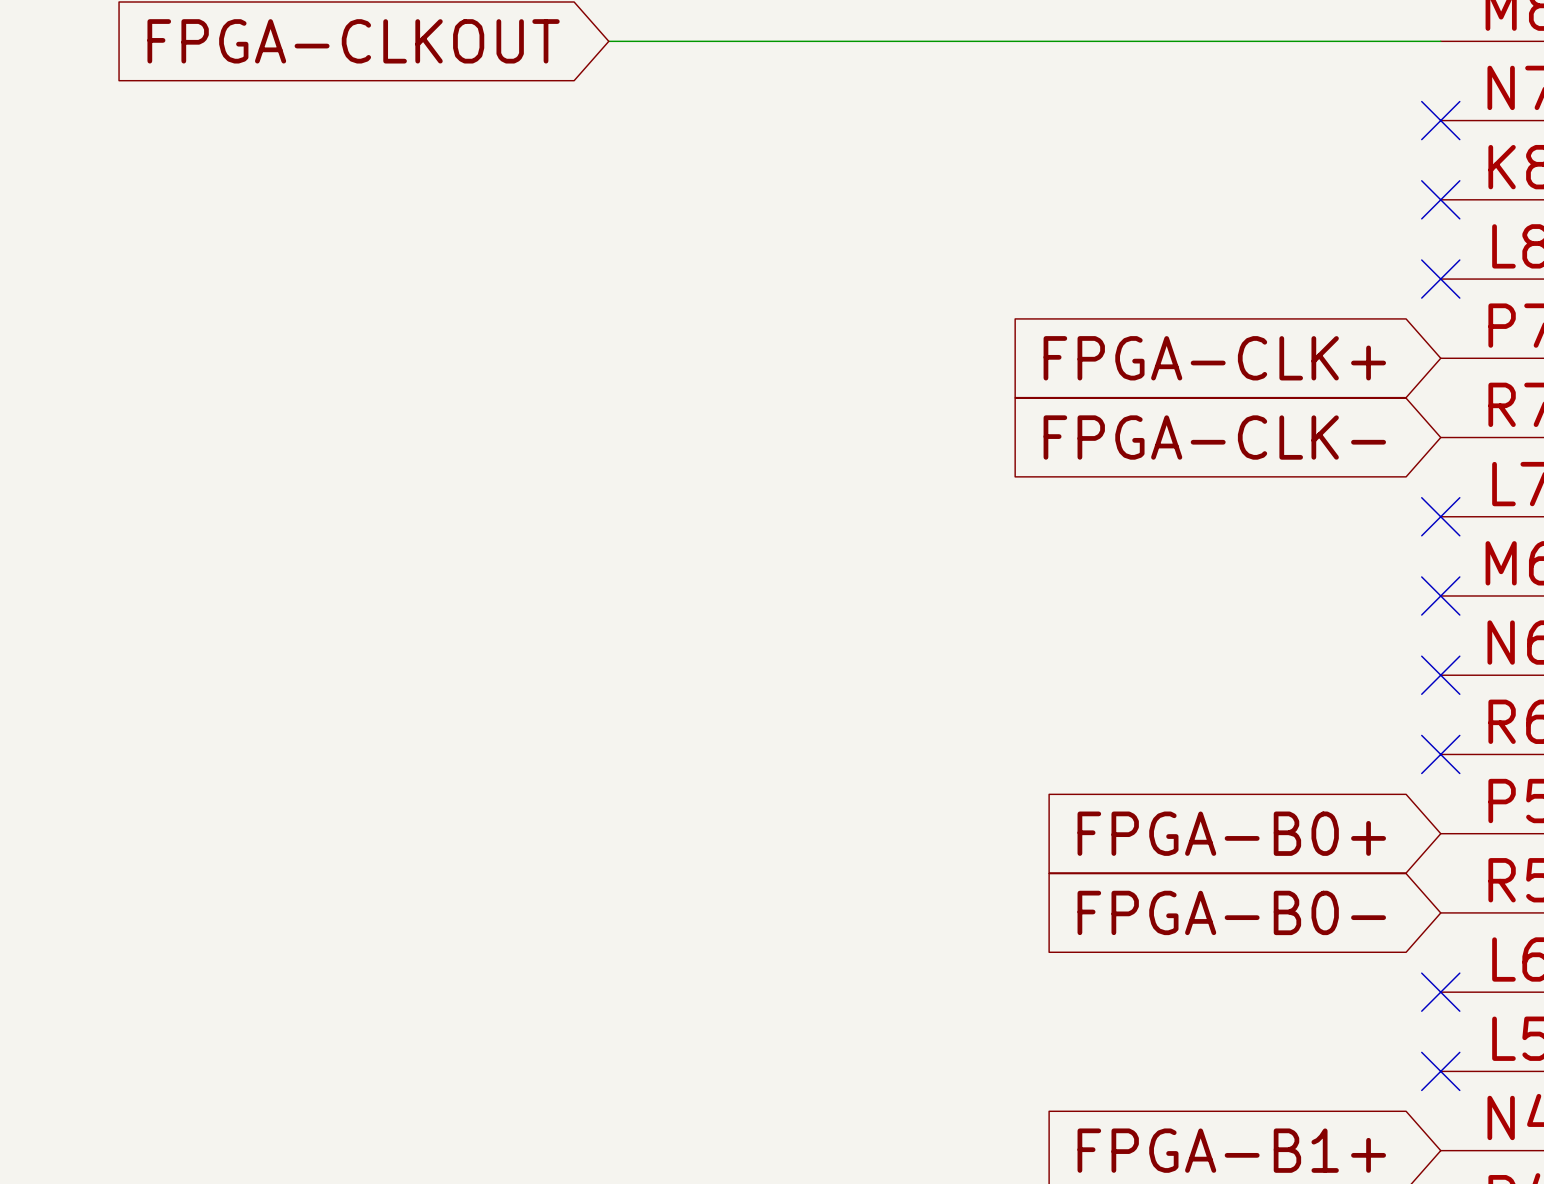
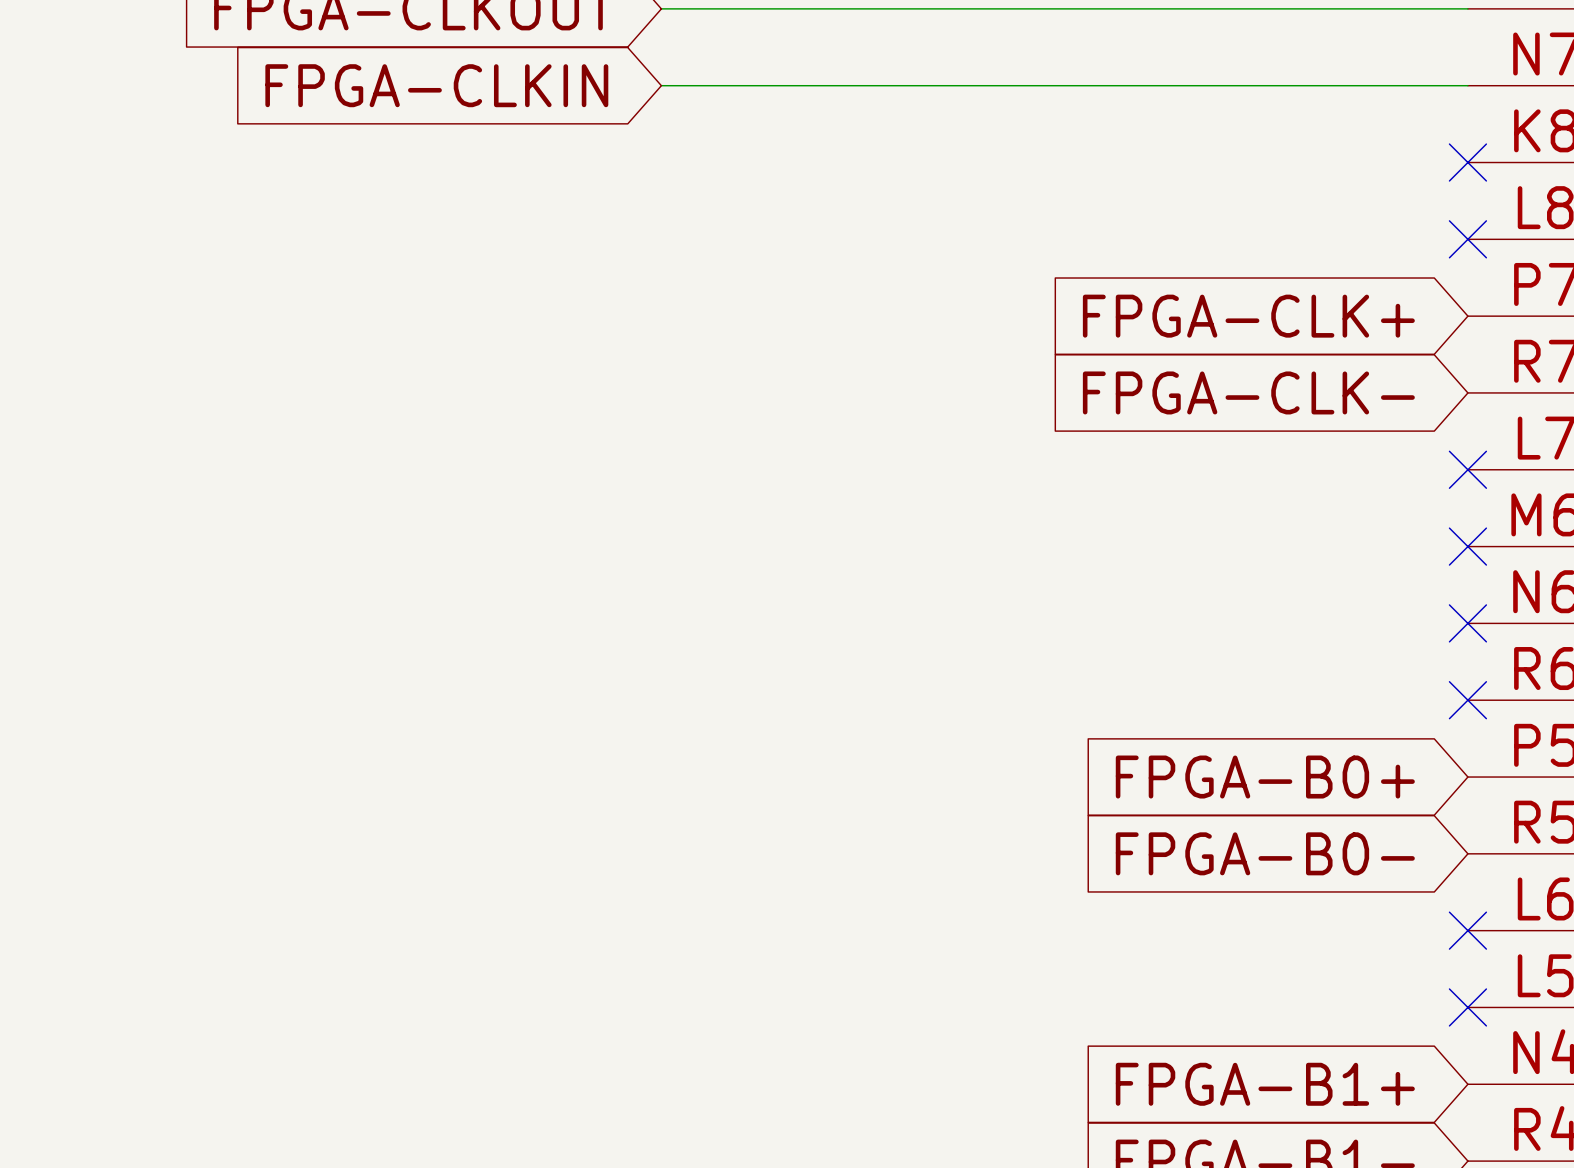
global label: none -> FPGA-CLKIN (436, 85)
wire: none -> (661, 85) (1467, 85)
no-connect mark: (1440, 120) -> none

